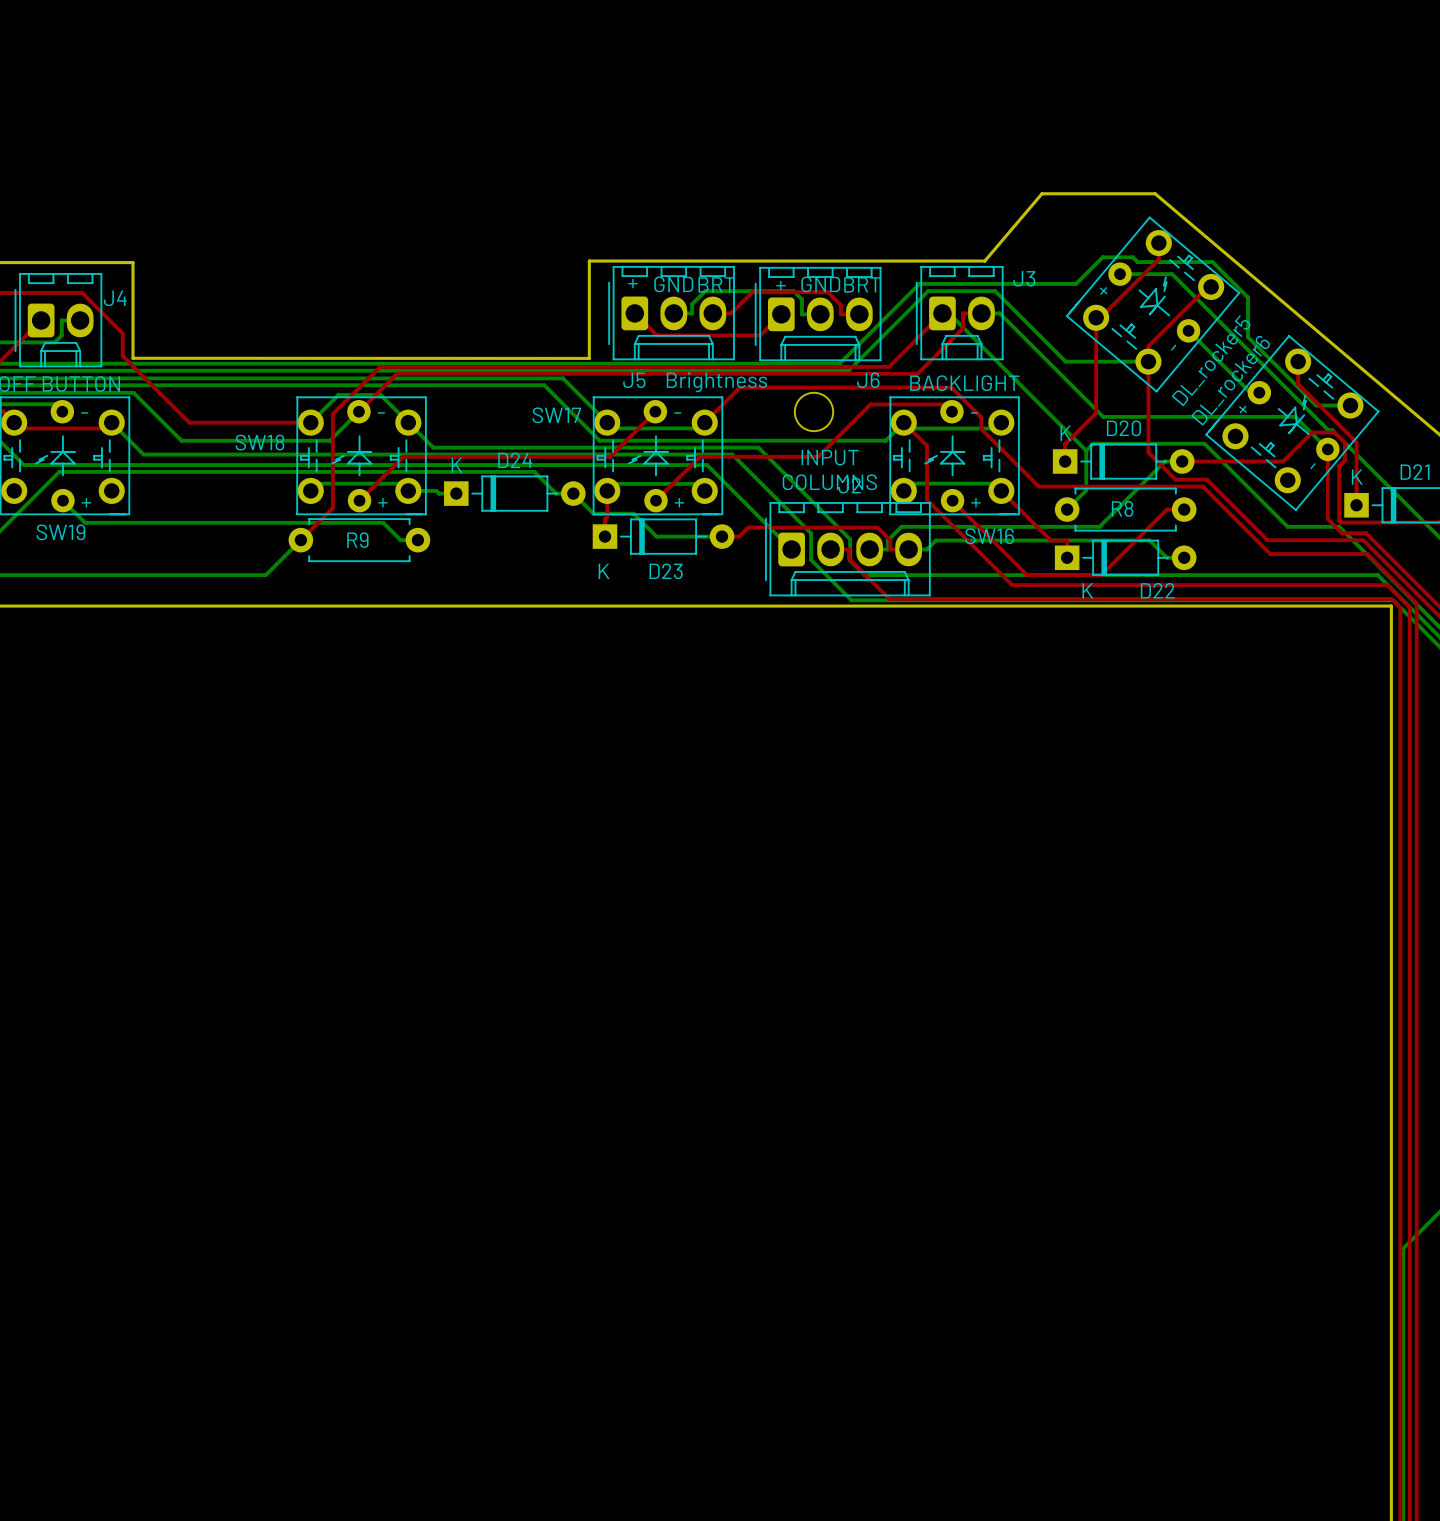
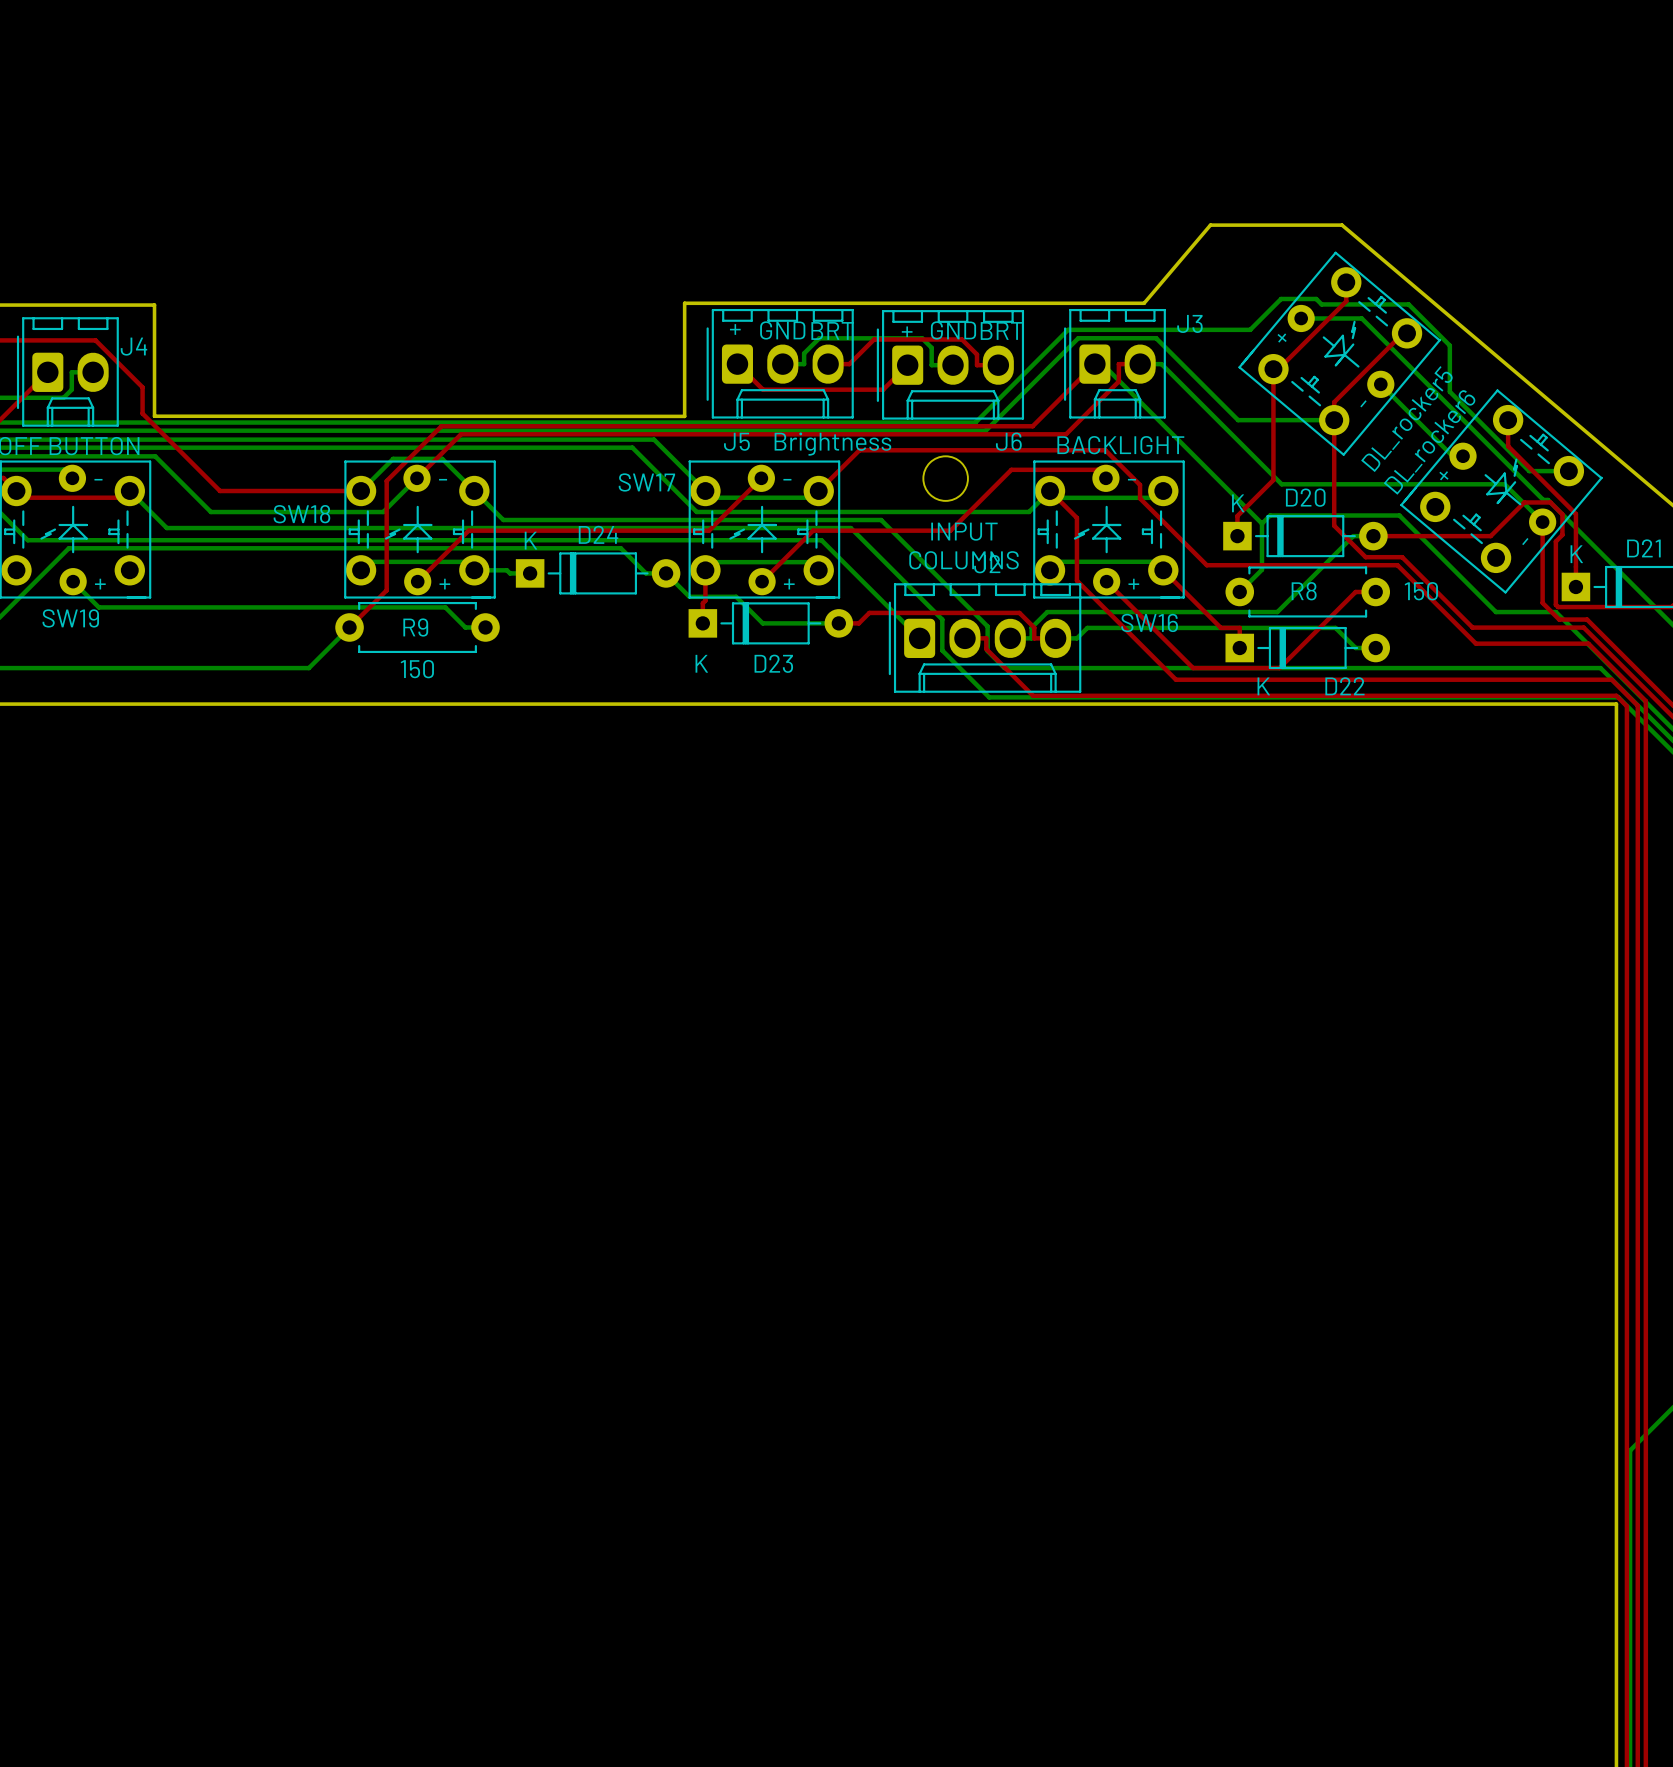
R8 value: none -> 150 (1421, 591)
R9 value: none -> 150 (417, 669)

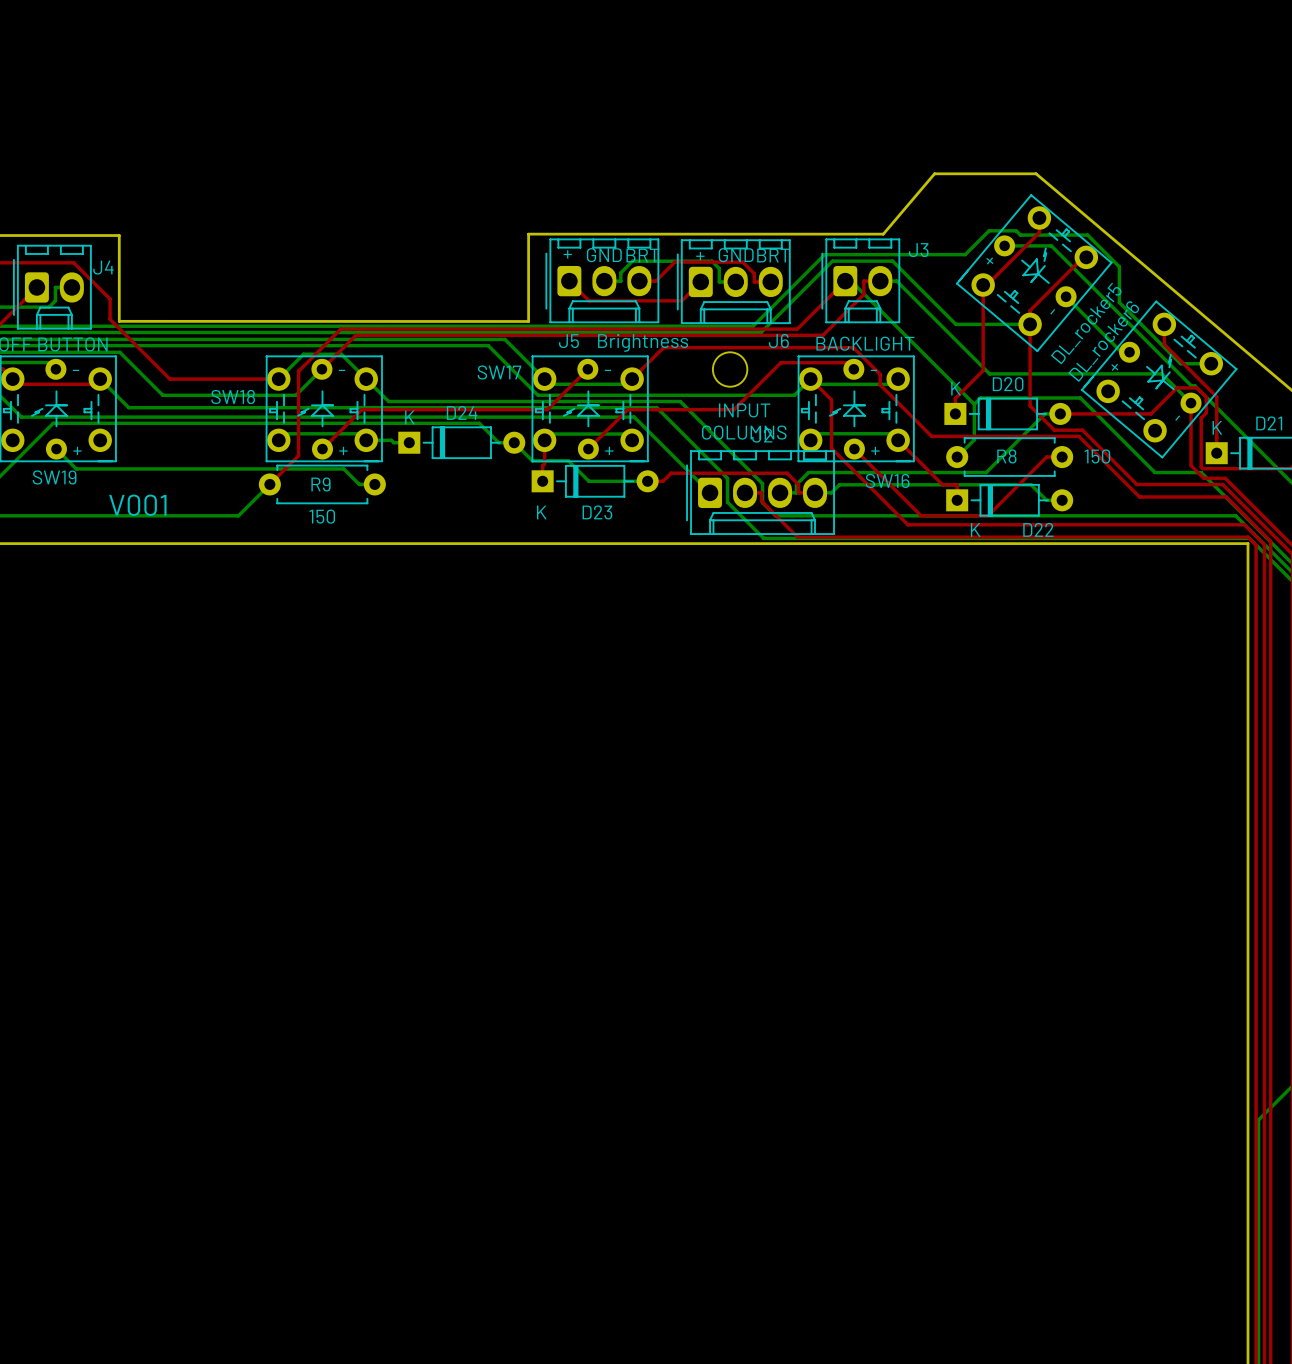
text: none -> V001 (137, 505)

